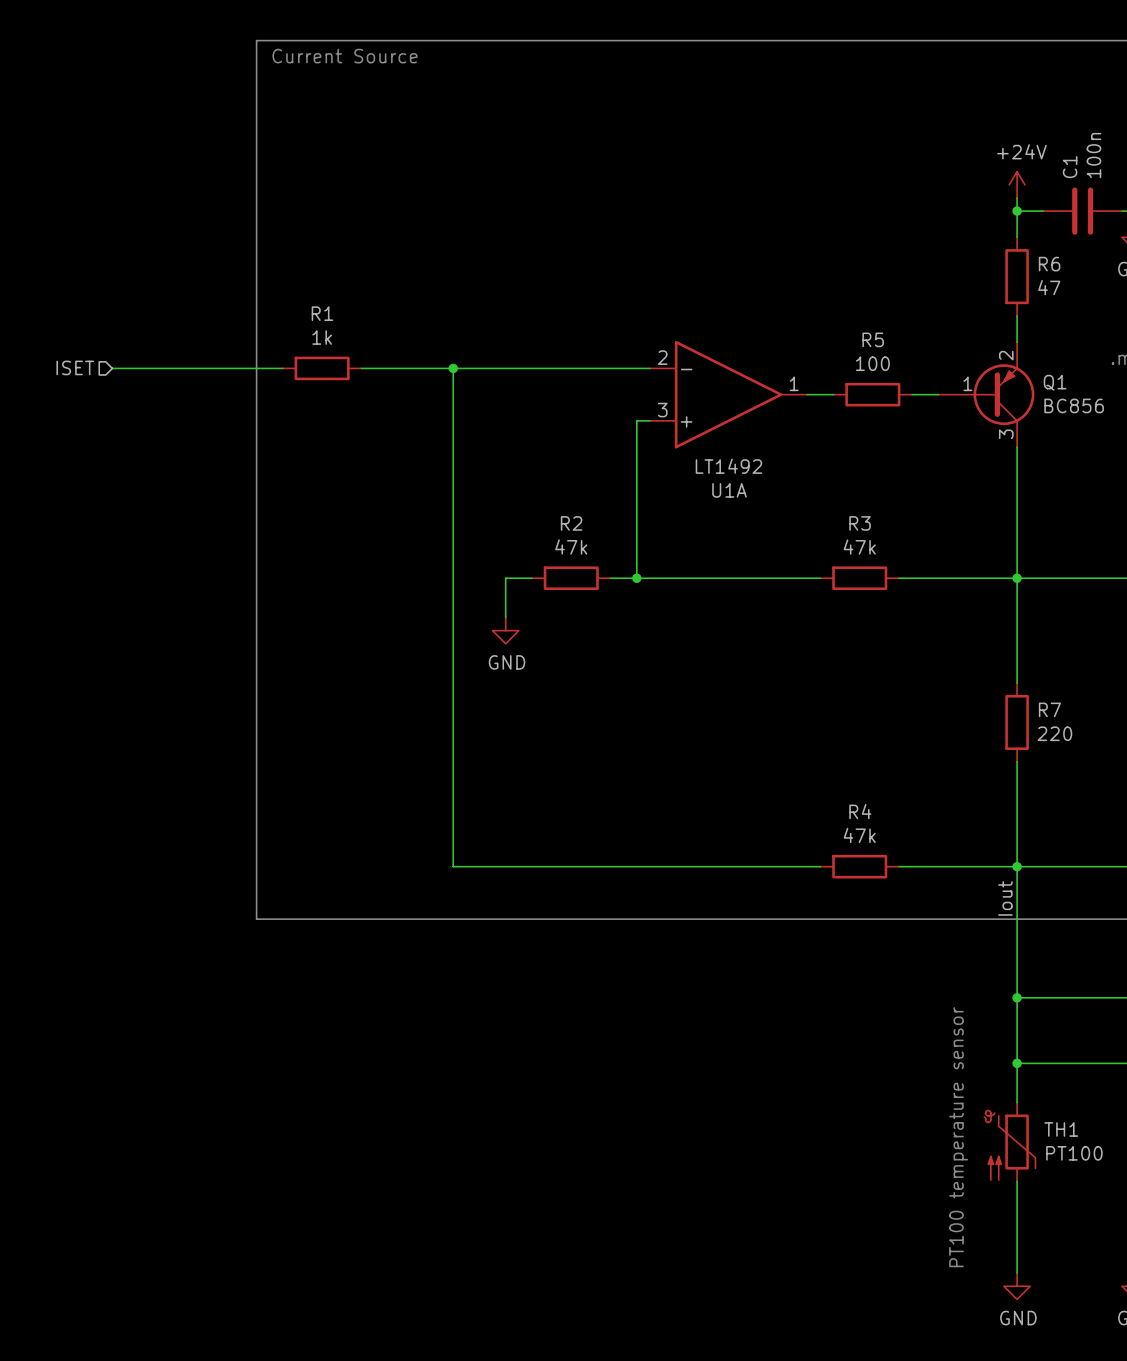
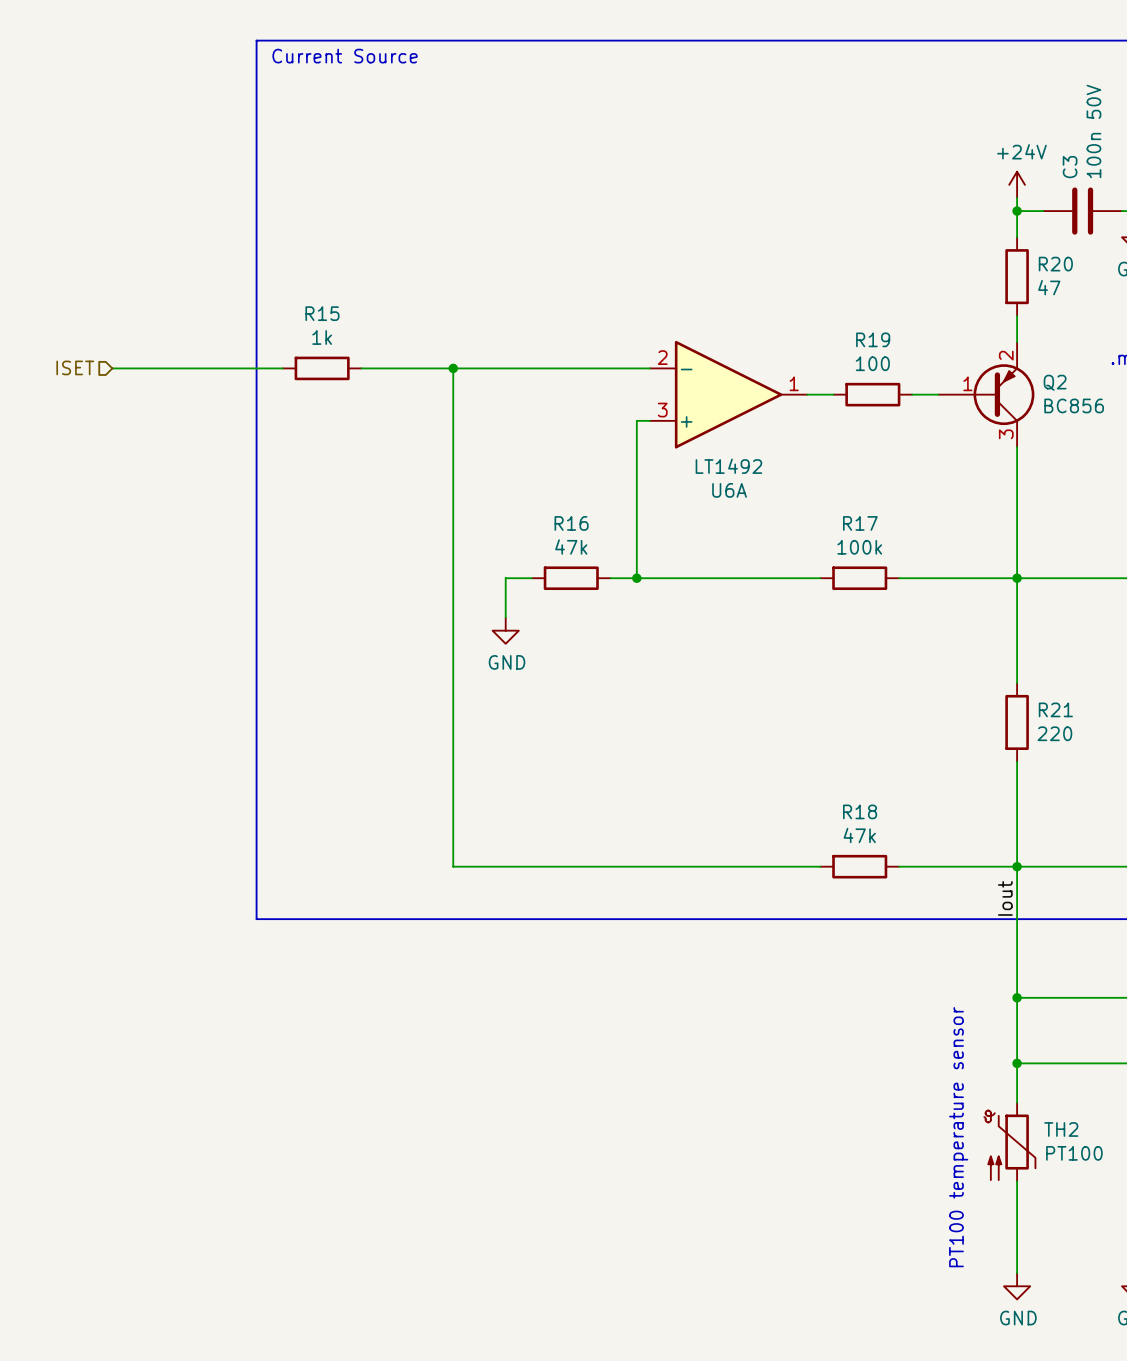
C1 value: 100n (1093, 155) -> 100n 50V (1093, 131)
C1 name: C1 (1070, 167) -> C3 (1070, 167)
R6 name: R6 (1049, 264) -> R20 (1055, 264)
R1 name: R1 (322, 313) -> R15 (322, 313)
R5 name: R5 (873, 339) -> R19 (873, 339)
Q1 name: Q1 (1055, 382) -> Q2 (1055, 382)
U1A name: U1A (729, 490) -> U6A (729, 490)
R2 name: R2 (571, 523) -> R16 (571, 523)
R3 name: R3 (860, 523) -> R17 (860, 523)
R3 value: 47k (859, 547) -> 100k (859, 547)
R7 name: R7 (1049, 709) -> R21 (1055, 709)
R4 name: R4 (860, 811) -> R18 (860, 811)
TH1 name: TH1 (1061, 1129) -> TH2 (1061, 1129)

